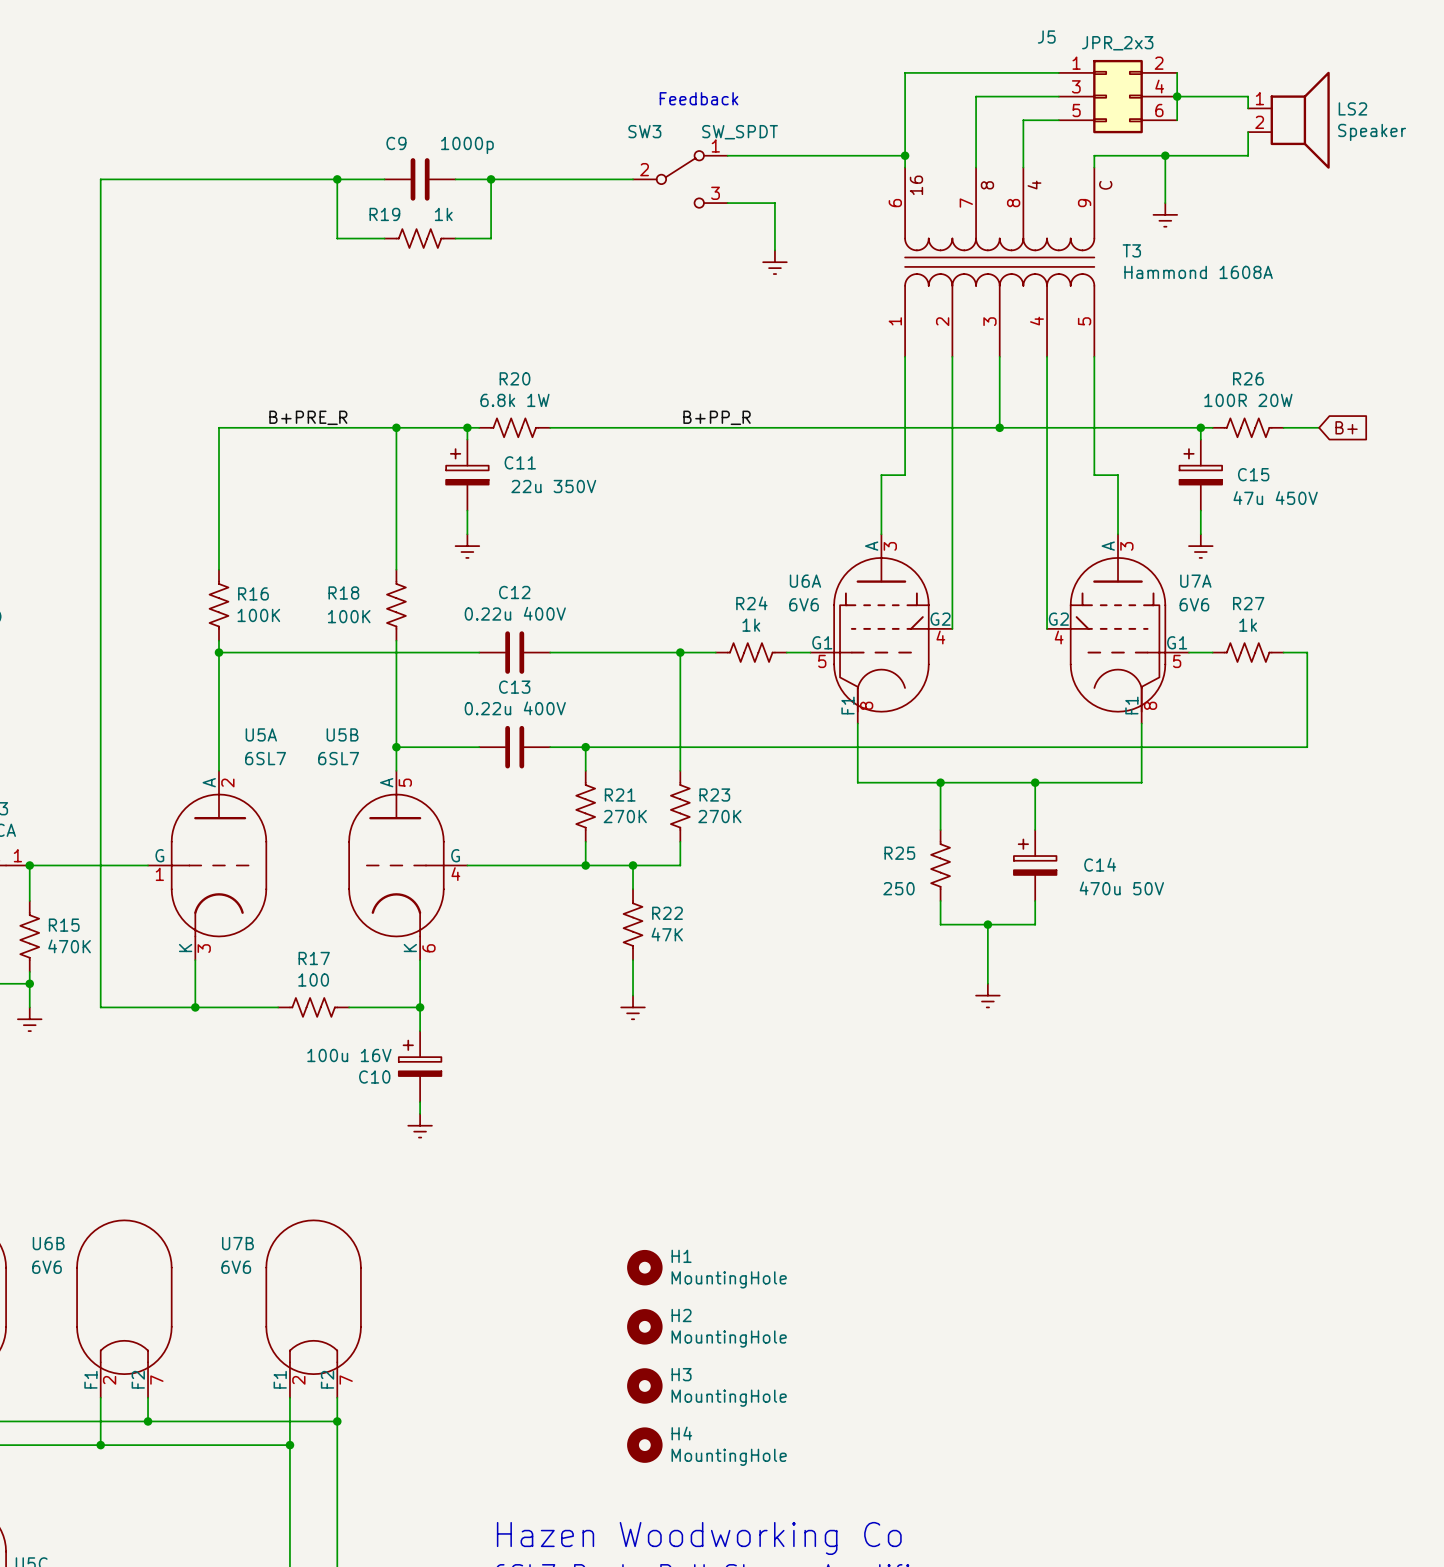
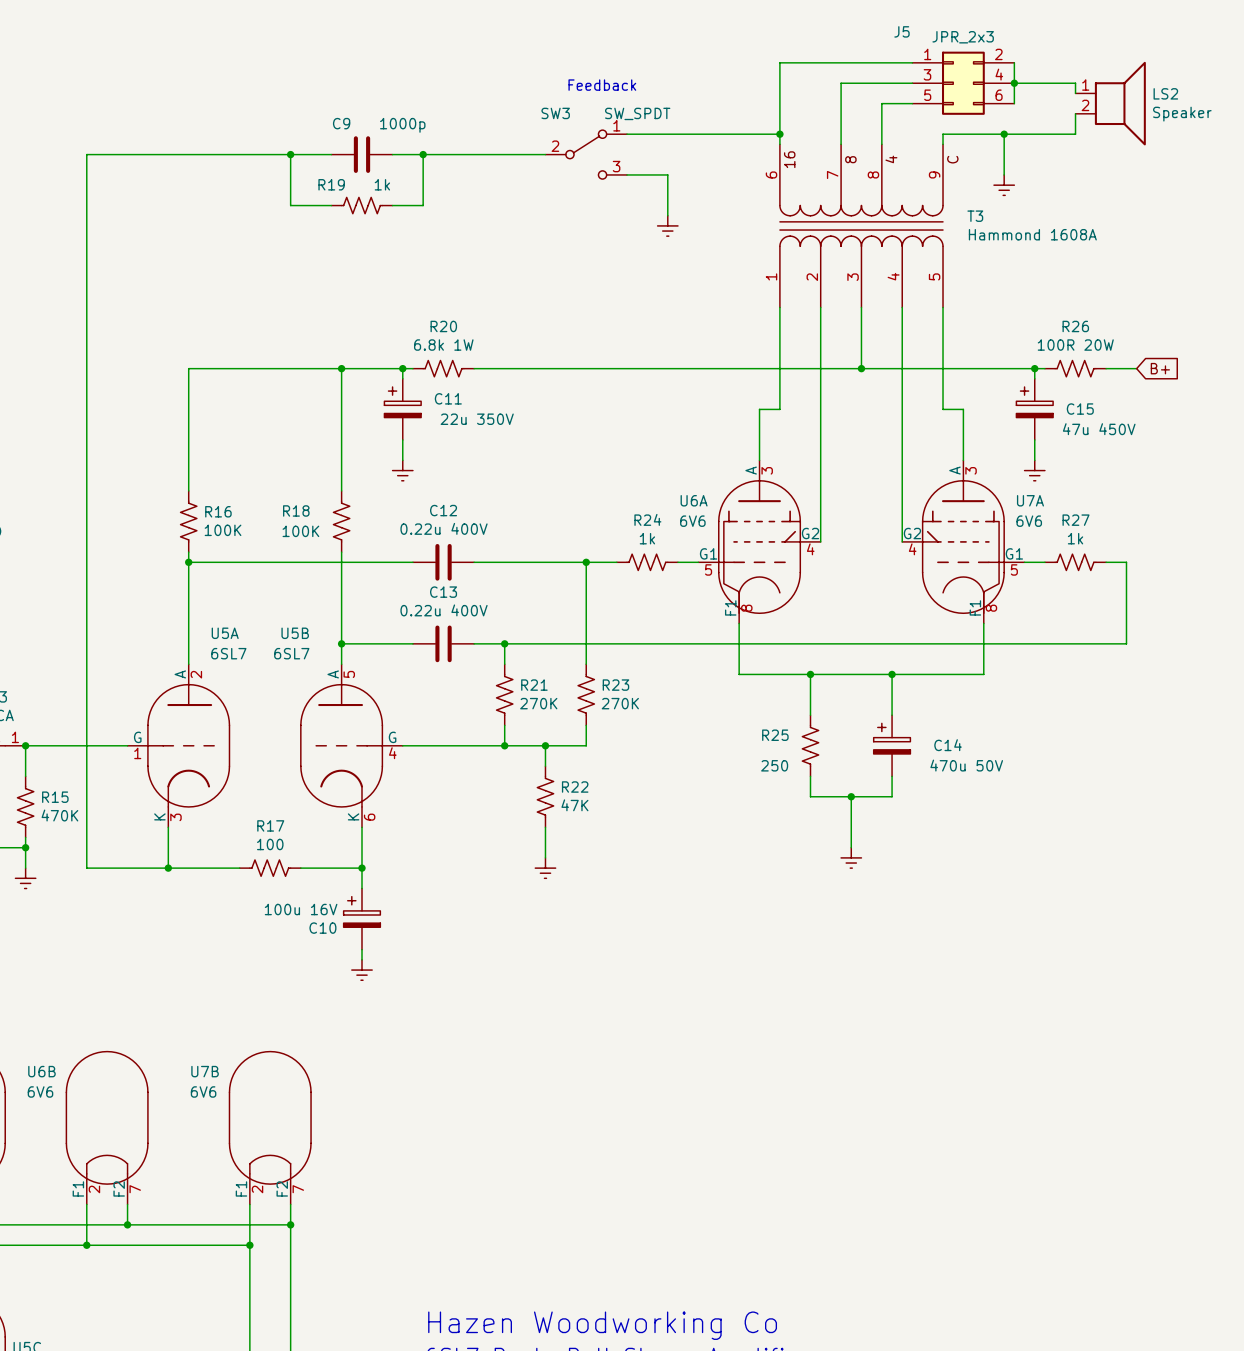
label: B+PRE_R (308, 417) -> none
label: B+PP_R (717, 417) -> none
H1: MountingHole (644, 1267) -> none
H2: MountingHole (644, 1326) -> none
H3: MountingHole (644, 1385) -> none
H4: MountingHole (644, 1445) -> none

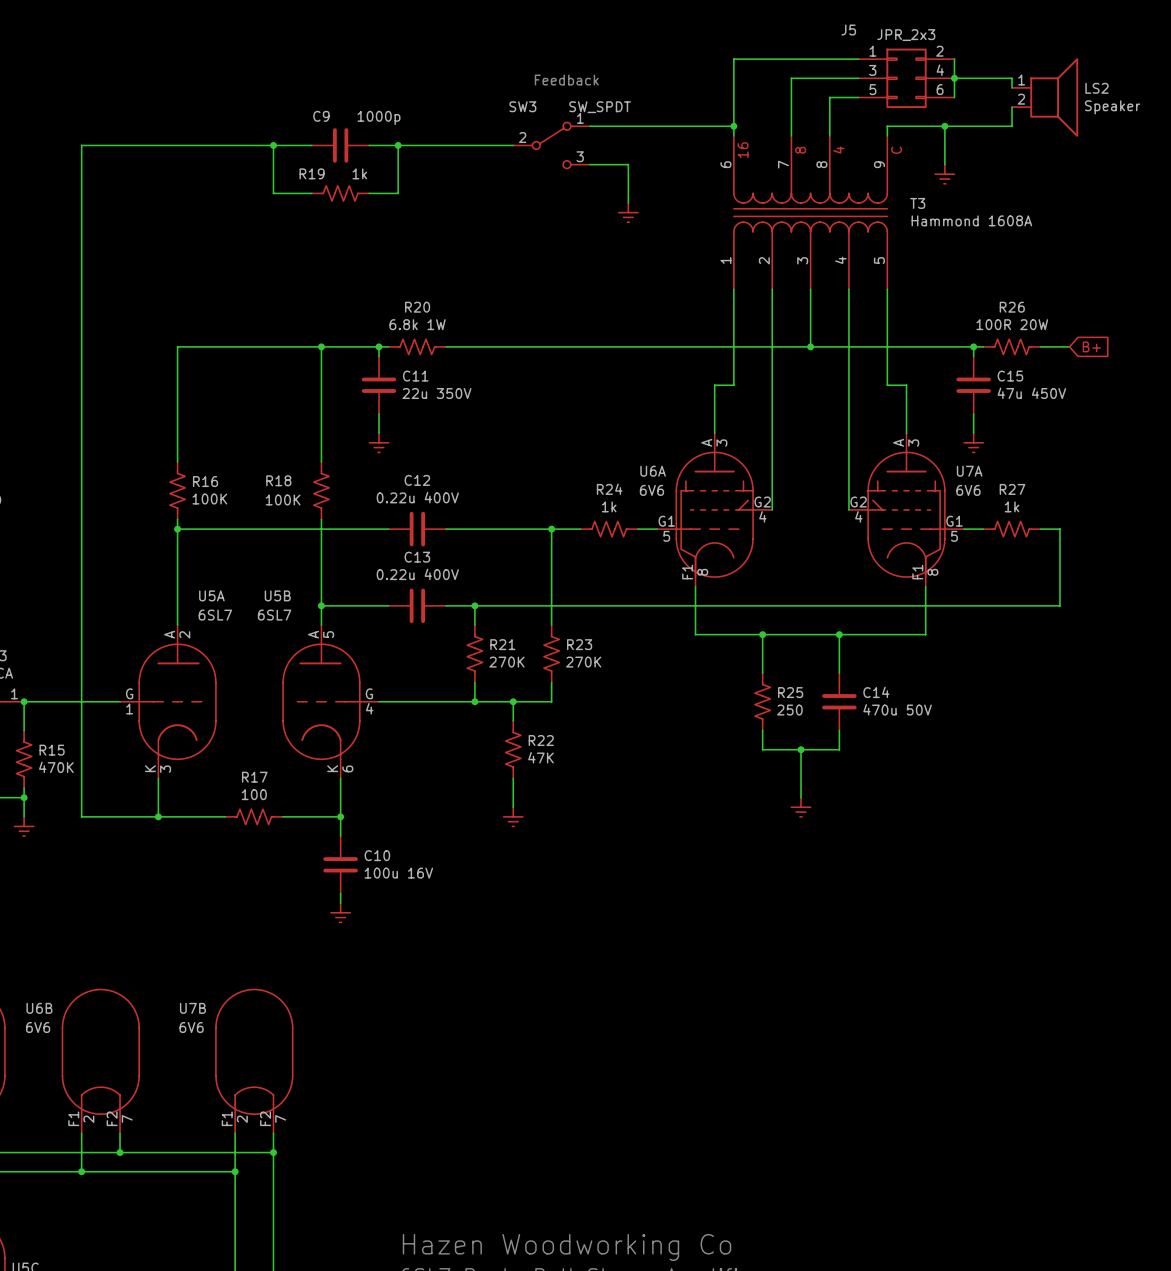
C11 symbol: [384, 378, 422, 441] -> [361, 356, 397, 415]
C15 symbol: [1016, 378, 1054, 441] -> [956, 356, 991, 415]
C14 symbol: [873, 715, 911, 777] -> [822, 672, 857, 731]
R25 name position: R25 (775, 735) -> R25 (790, 692)
R25 value position: 250 (774, 765) -> 250 (789, 710)
C10 symbol: [343, 888, 381, 950] -> [323, 836, 358, 894]
C10 value position: 100u 16V (301, 909) -> 100u 16V (398, 873)
C10 name position: C10 (322, 928) -> C10 (377, 855)

